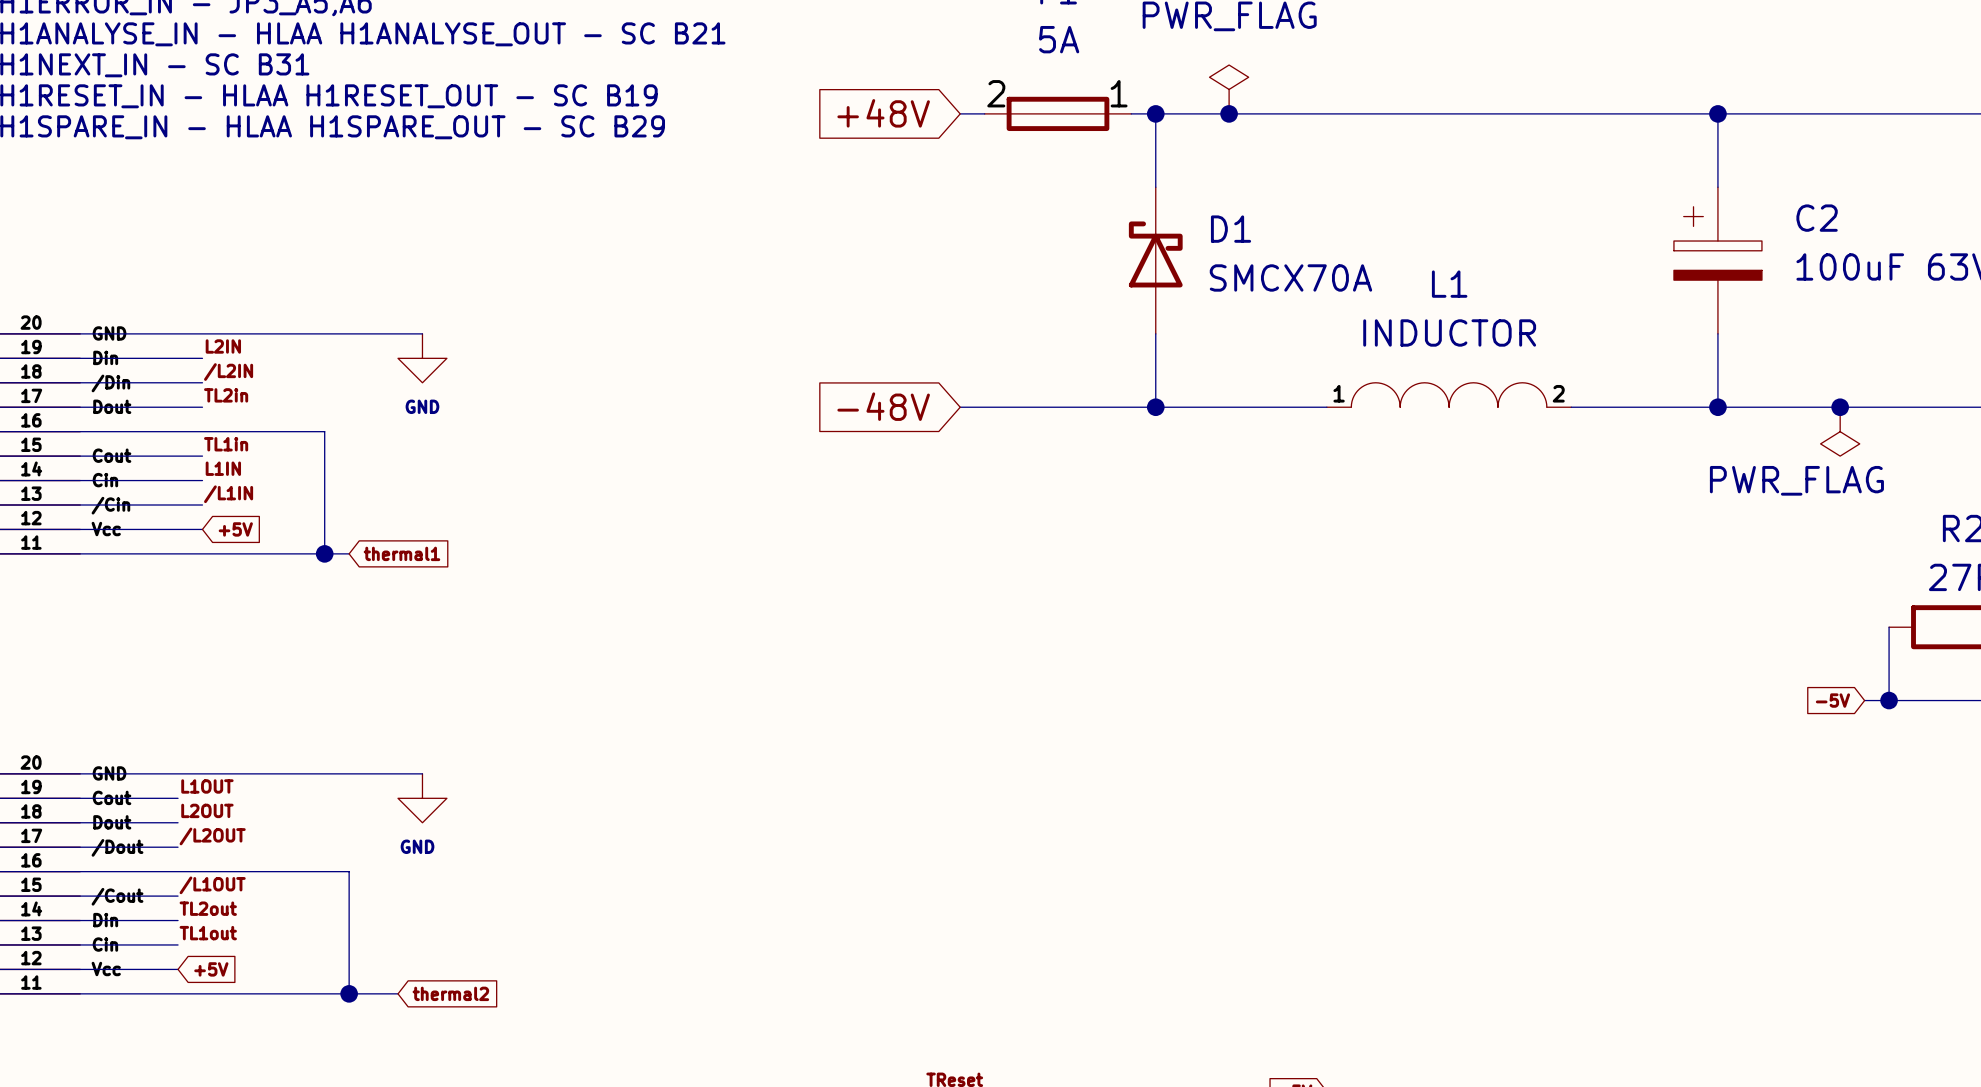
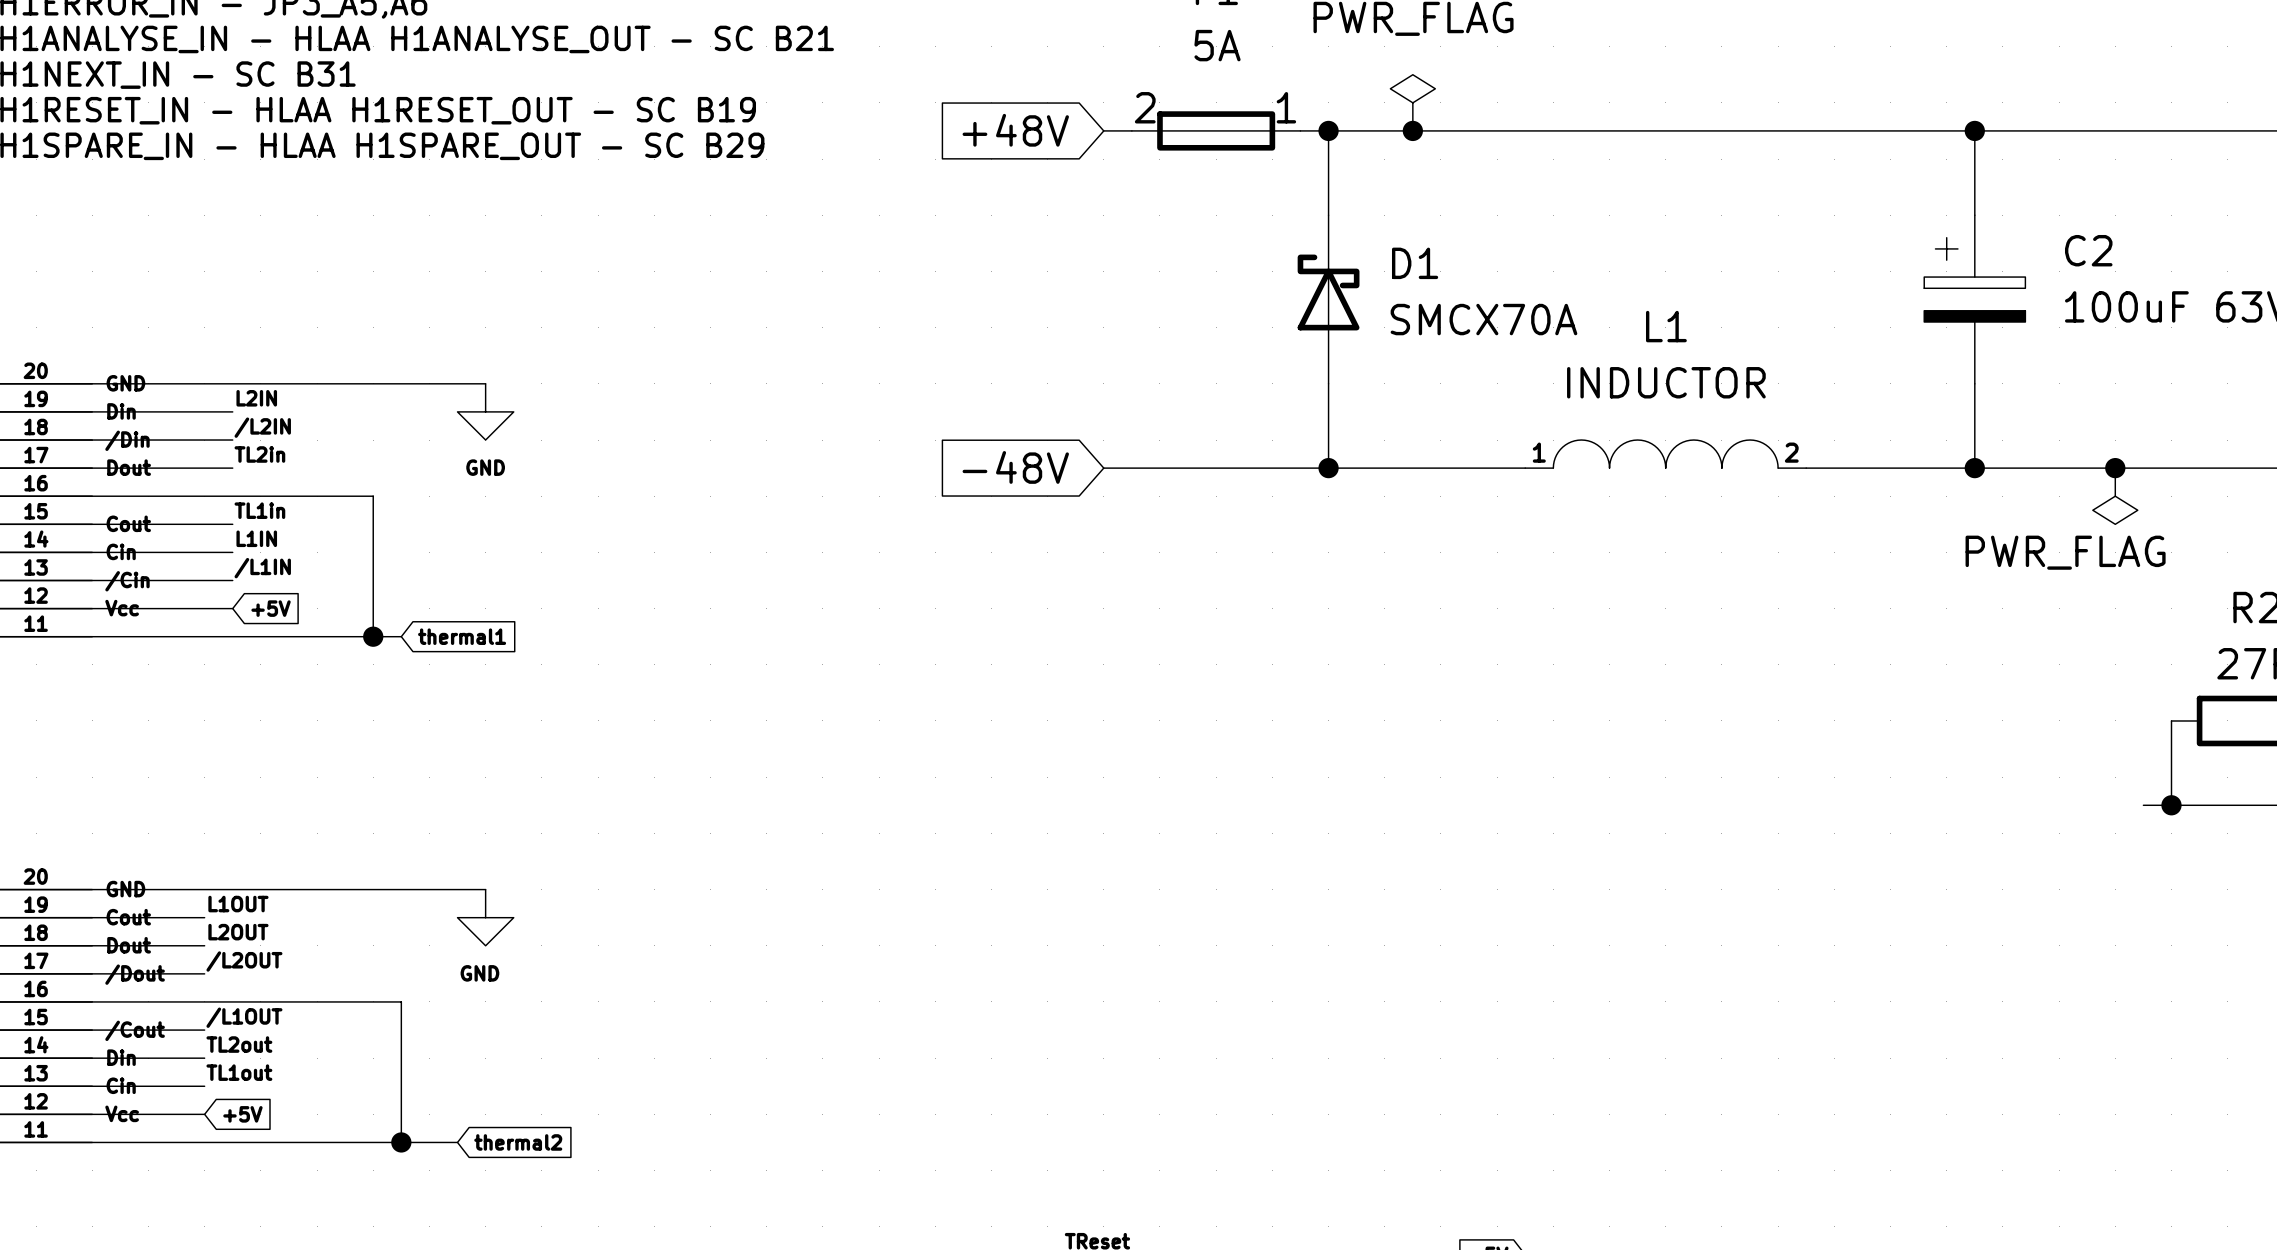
global label: -5V (1832, 700) -> none

